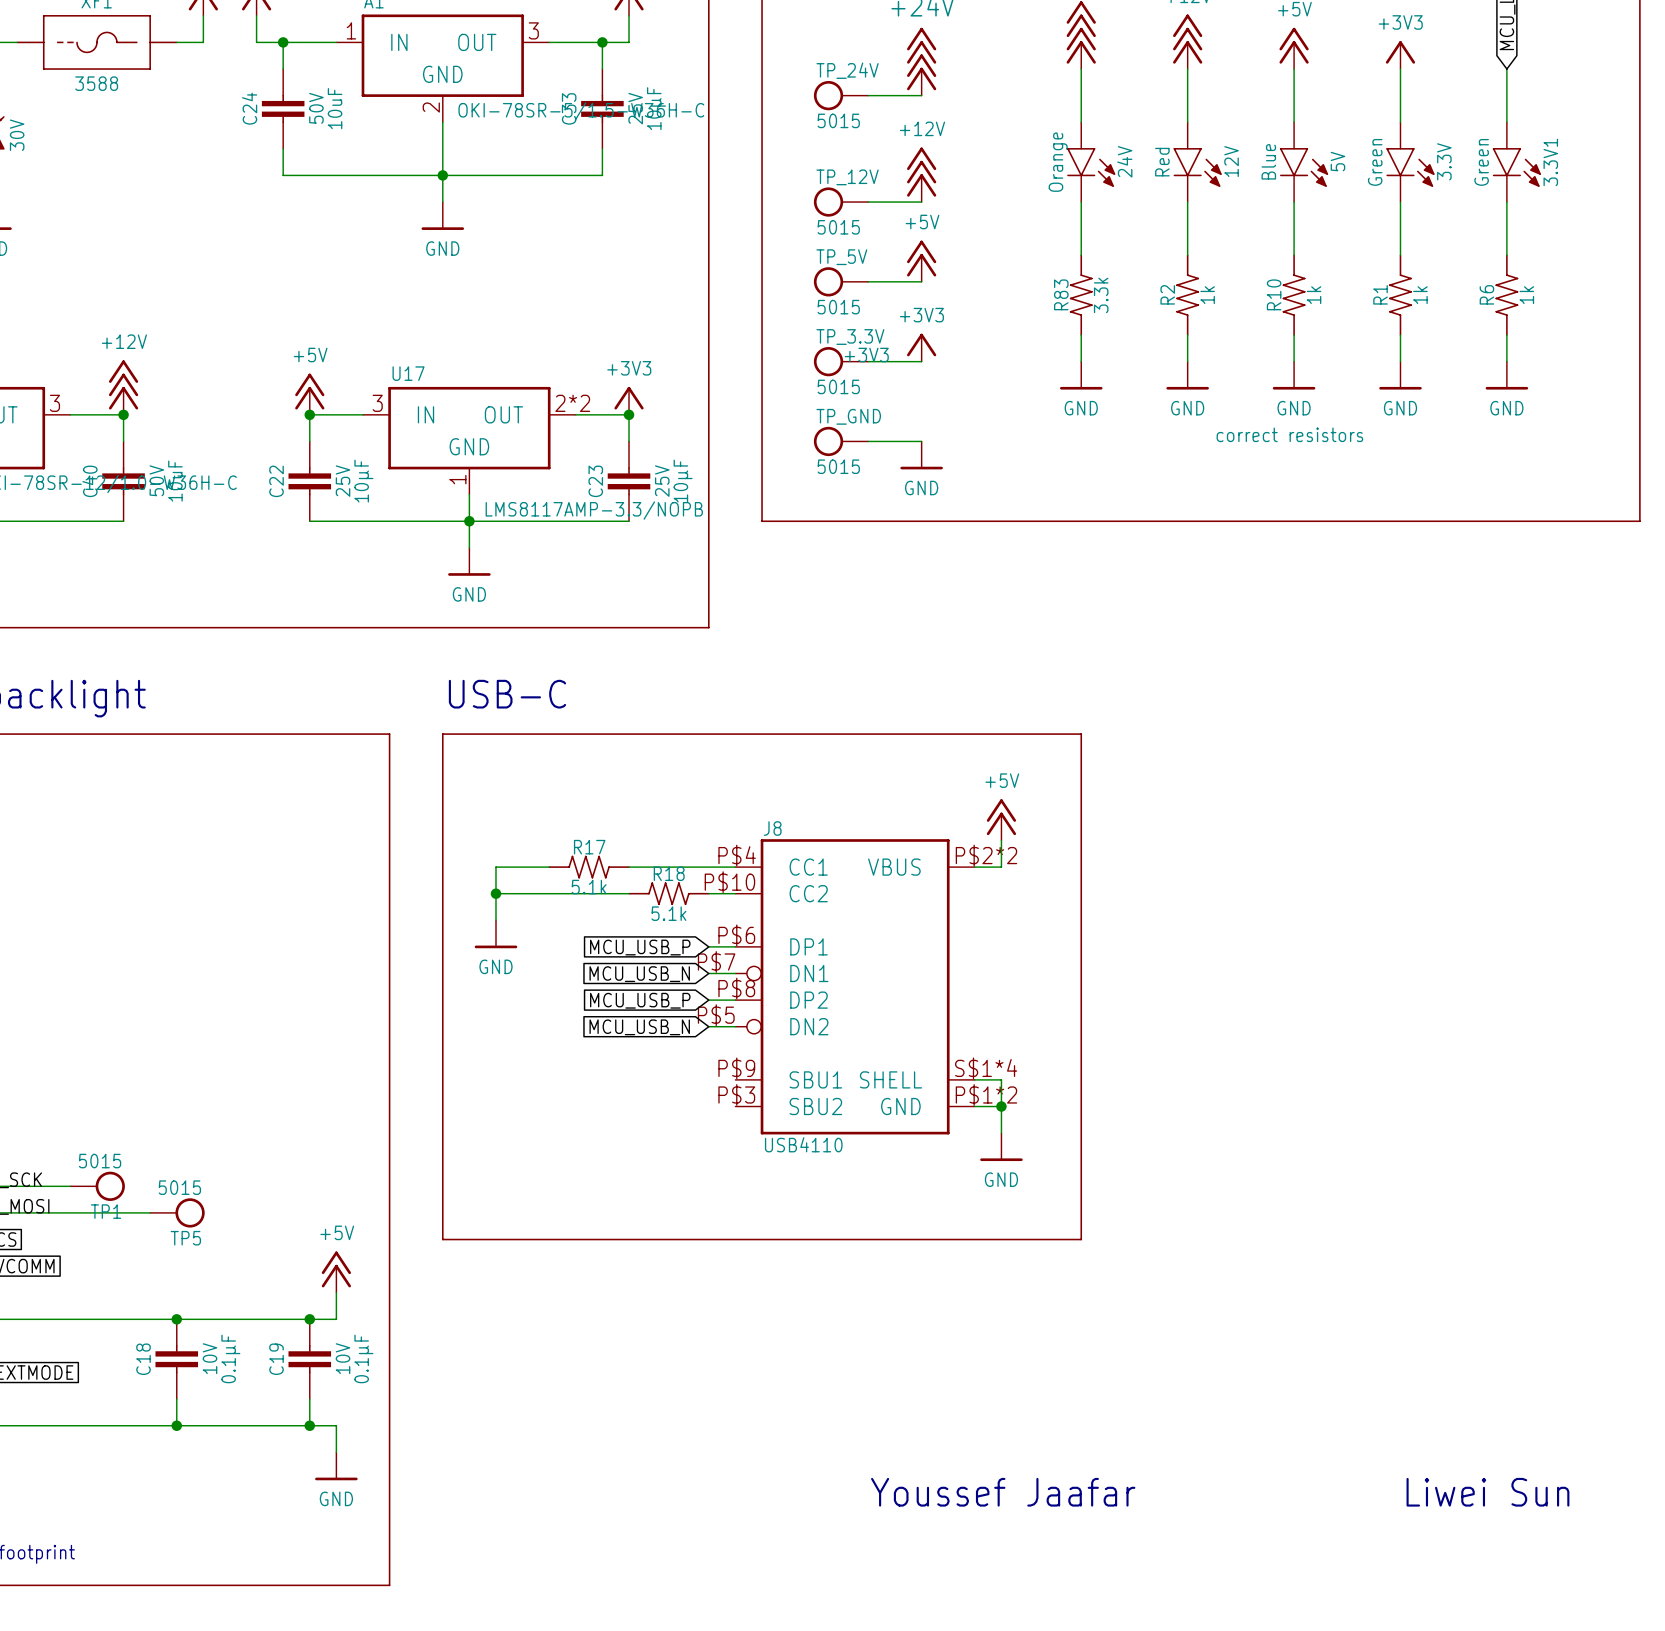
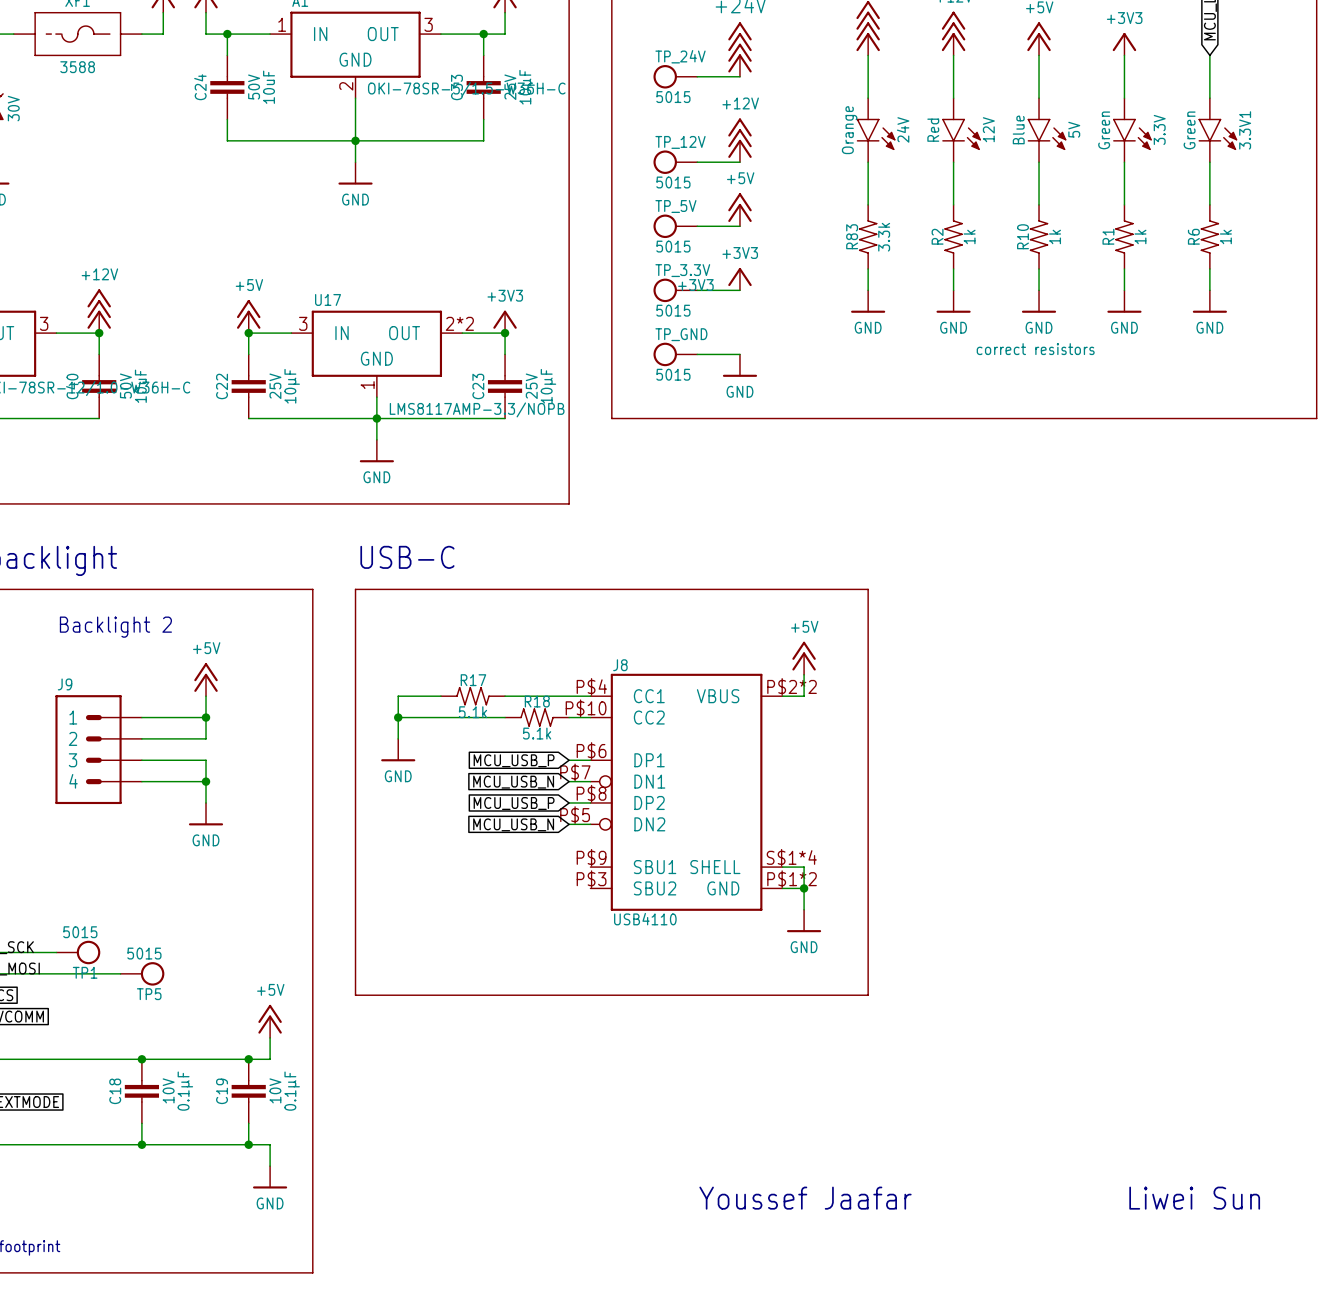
text: none -> Backlight 2 (115, 627)
power symbol: none -> +5V (206, 679)
wire: none -> (206, 696) (206, 738) (141, 738)
wire: none -> (141, 717) (206, 717)
junction: none -> (206, 717)
J9: none -> (98, 749)
wire: none -> (141, 760) (206, 760) (206, 802)
wire: none -> (141, 781) (206, 781)
junction: none -> (206, 781)
power symbol: none -> GND (206, 814)

